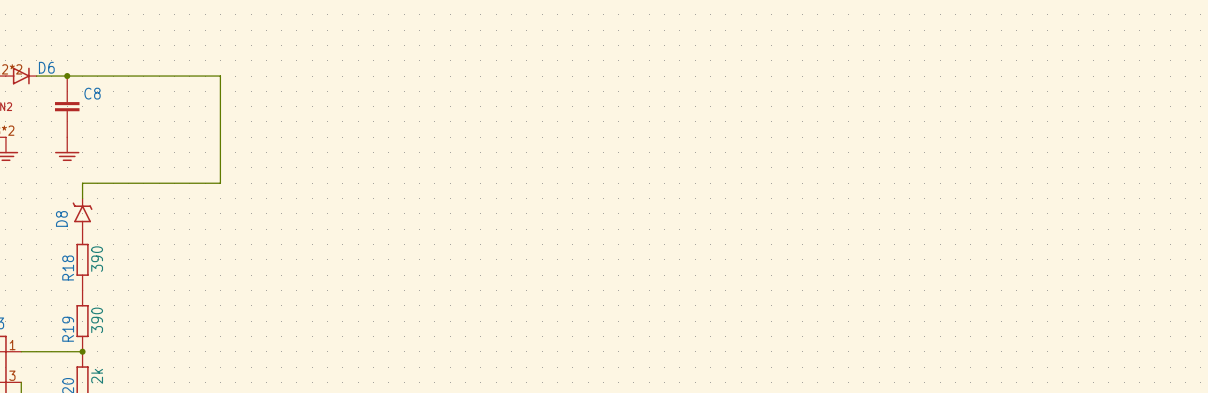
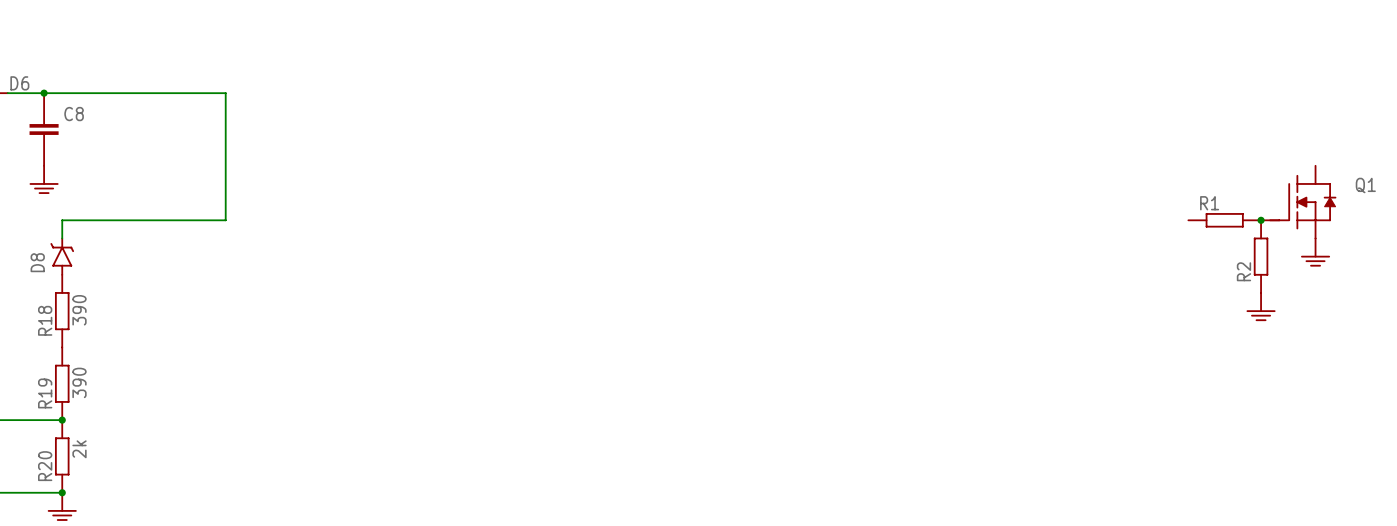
Q1: none -> (1298, 202)
R1: none -> (1224, 220)
junction: none -> (1261, 220)
power symbol: none -> (1315, 252)
R2: none -> (1261, 256)
power symbol: none -> (1261, 307)

